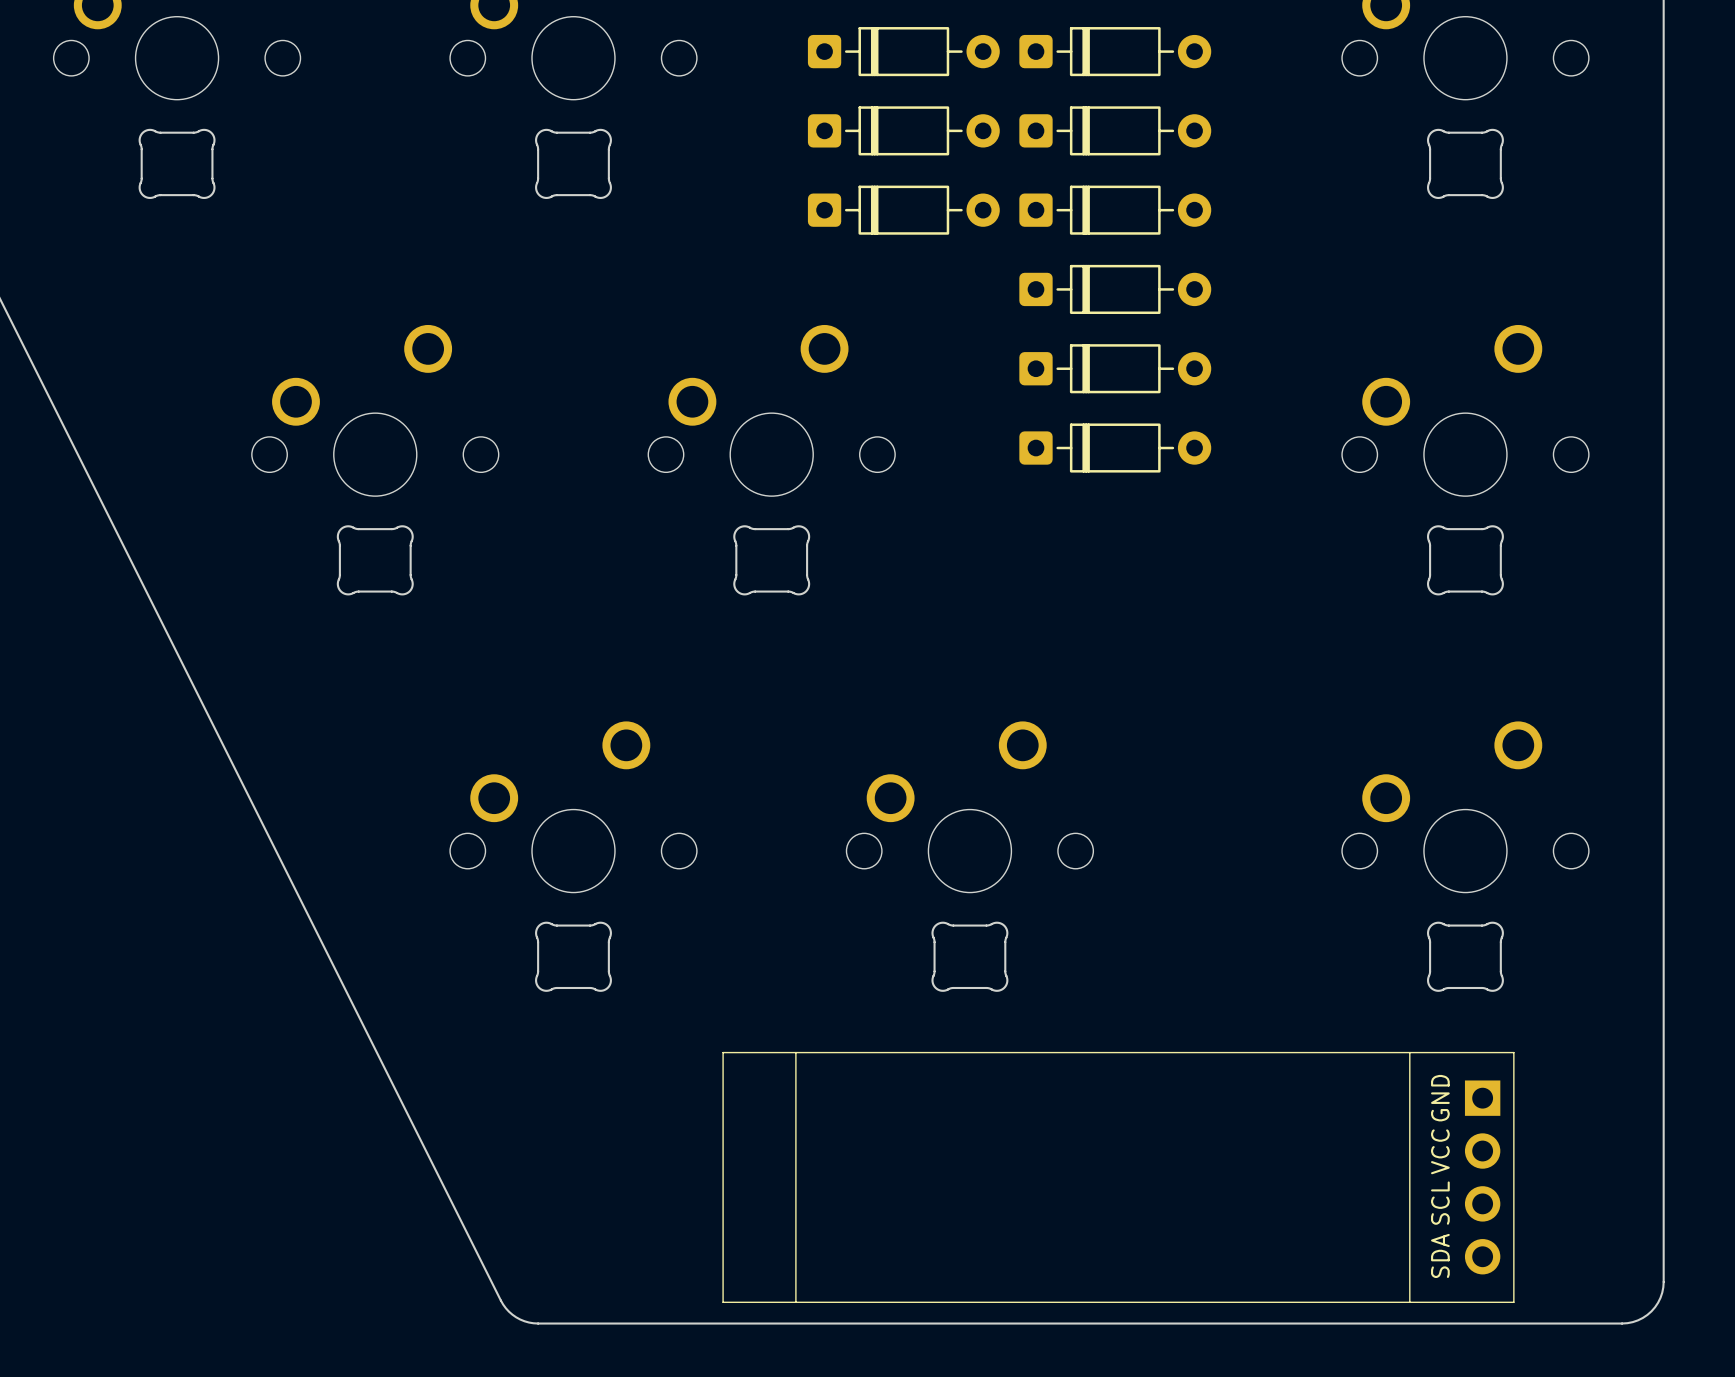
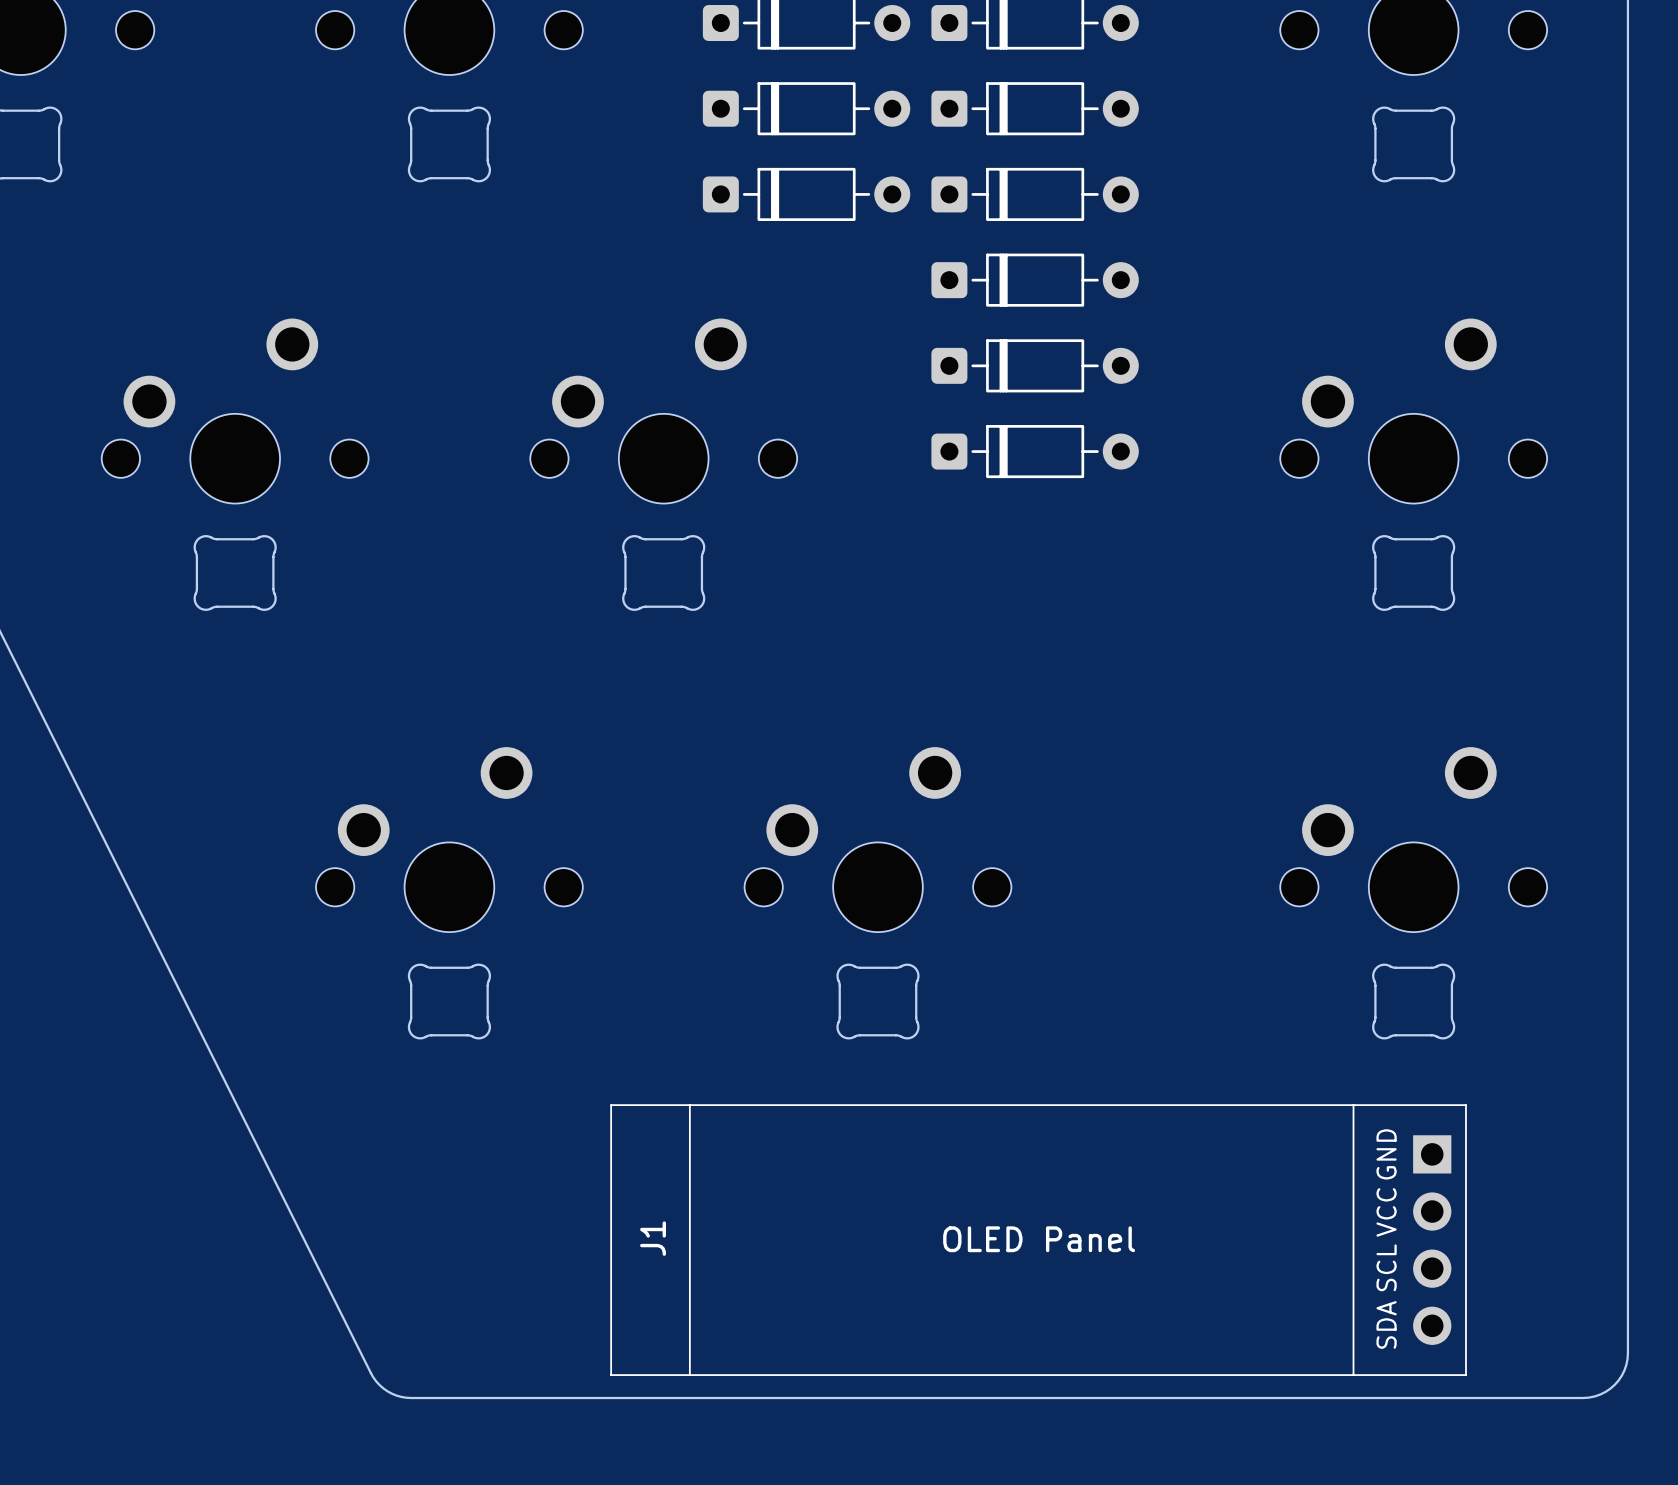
J1 name: none -> J1 (653, 1238)
J1 text: none -> OLED Panel (1039, 1239)

